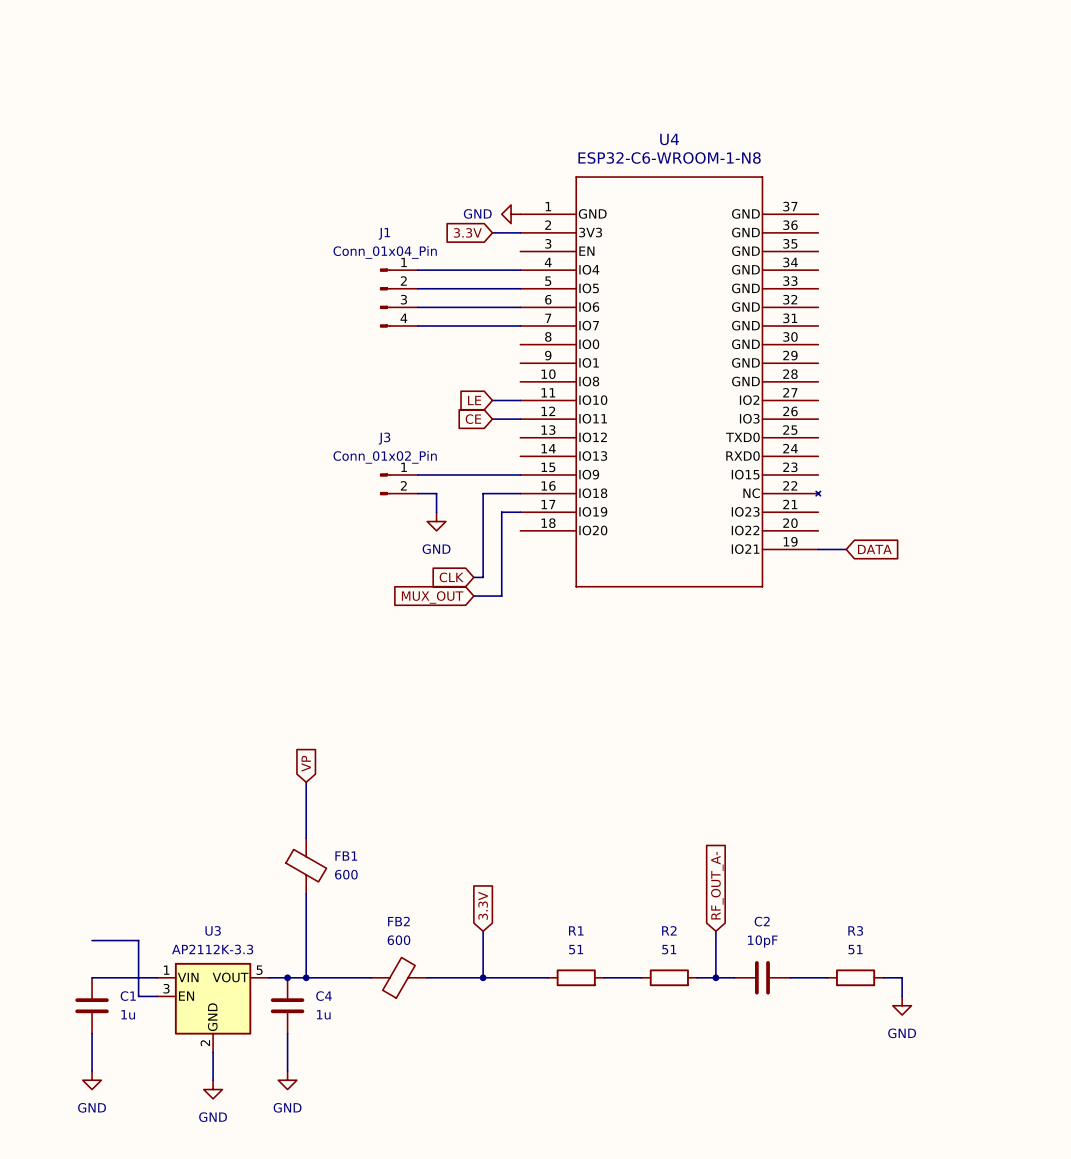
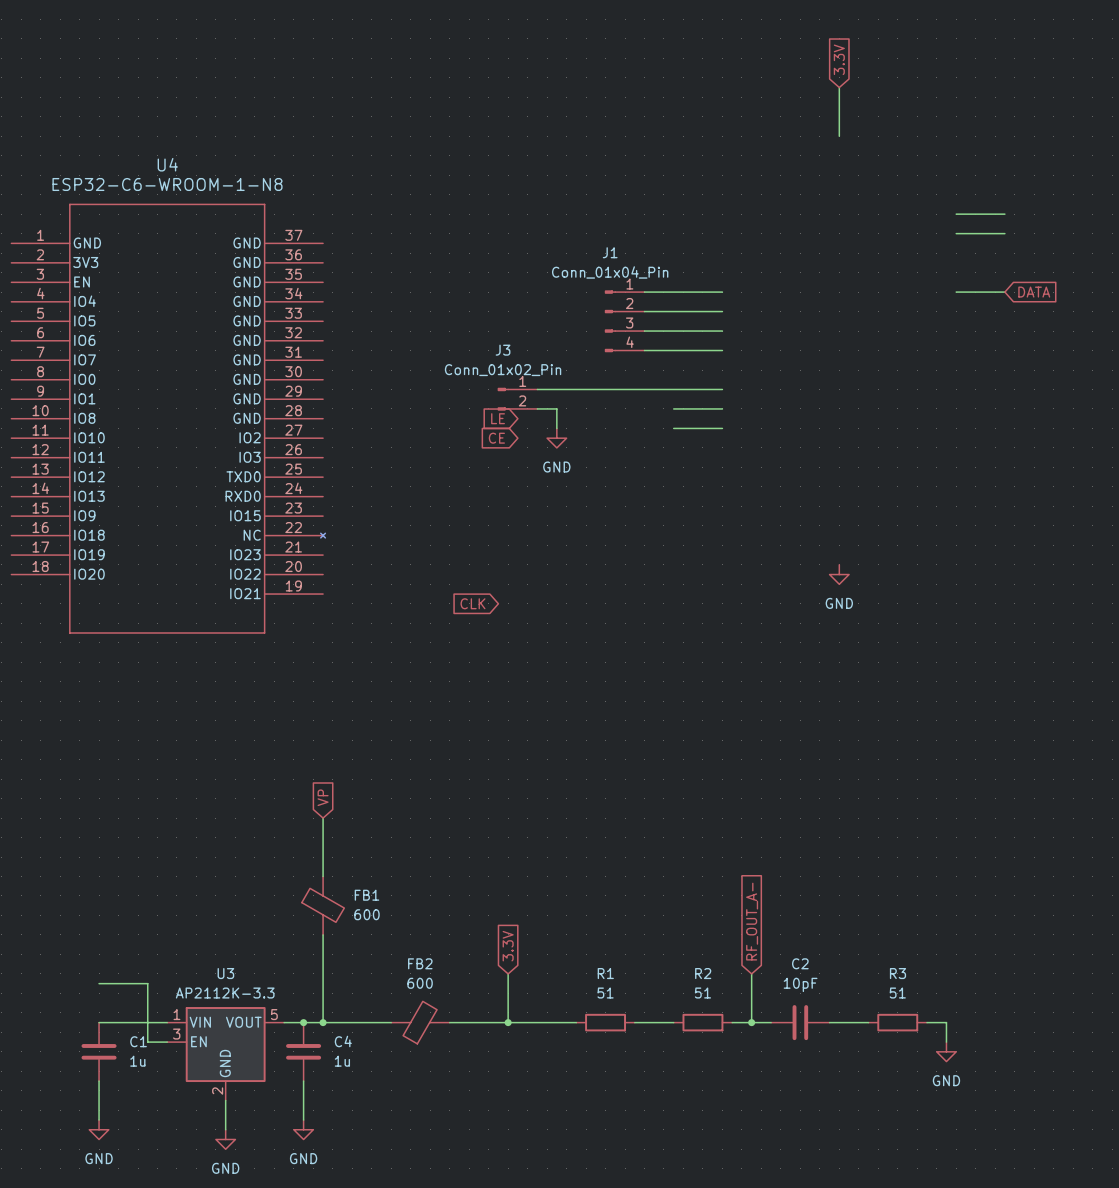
global label: none -> 3.3V (839, 59)
wire: none -> (839, 87) (839, 136)
wire: none -> (956, 214) (1004, 214)
power symbol: GND (511, 214) -> none
wire: none -> (956, 233) (1004, 233)
global label: 3.3V (467, 232) -> none
wire: (492, 232) (520, 232) -> none
wire: (417, 270) (520, 270) -> none
wire: none -> (644, 292) (722, 292)
wire: none -> (956, 292) (1004, 292)
global label: none -> DATA (1034, 292)
wire: (417, 288) (520, 288) -> none
J1 position: (399, 298) -> (624, 321)
wire: none -> (644, 311) (722, 311)
wire: (417, 307) (520, 307) -> none
wire: none -> (644, 331) (722, 331)
wire: (417, 326) (520, 326) -> none
wire: none -> (644, 350) (722, 350)
wire: none -> (537, 389) (722, 389)
U4 position: (670, 381) -> (168, 418)
wire: none -> (673, 408) (722, 408)
wire: (492, 400) (520, 400) -> none
wire: none -> (673, 428) (722, 428)
wire: (492, 419) (520, 419) -> none
power symbol: none -> GND (556, 438)
wire: (417, 474) (520, 474) -> none
J3 position: (399, 484) -> (517, 399)
wire: (417, 493) (436, 493) (436, 512) -> (537, 408) (556, 408) (556, 428)
wire: (520, 493) (483, 493) (483, 577) (473, 577) -> none
wire: (520, 512) (501, 512) (501, 596) (473, 596) -> none
power symbol: GND (436, 521) -> none
power symbol: none -> GND (839, 574)
wire: (818, 549) (846, 549) -> none
global label: DATA (874, 549) -> none
global label: MUX_OUT (432, 597) -> none

